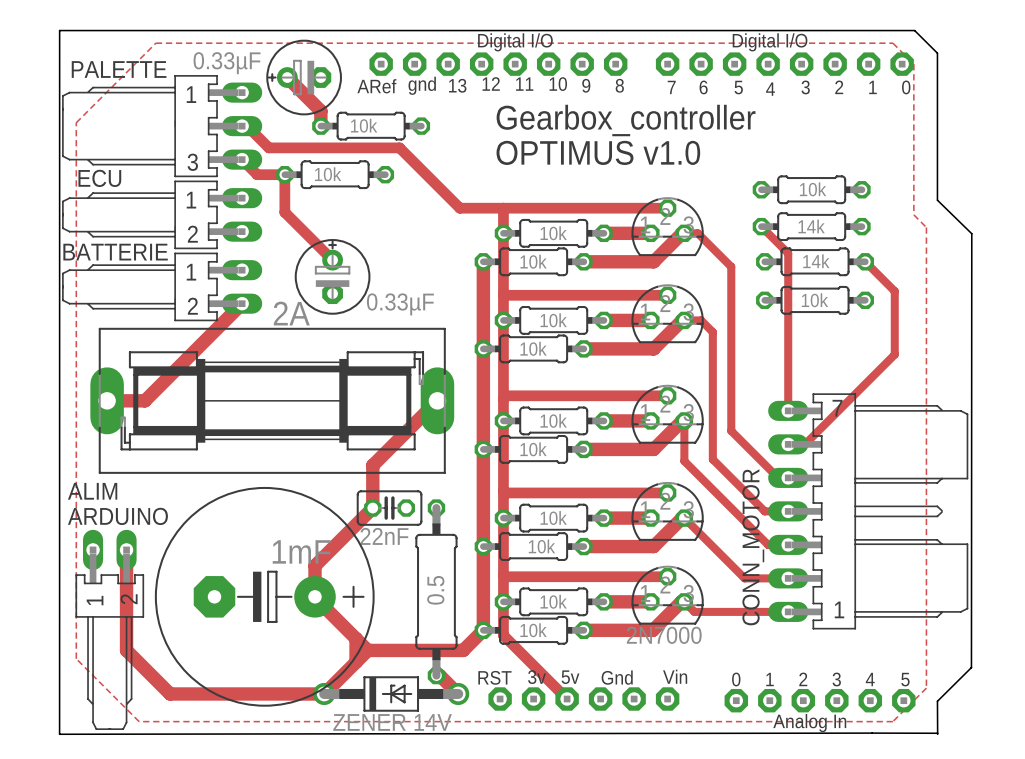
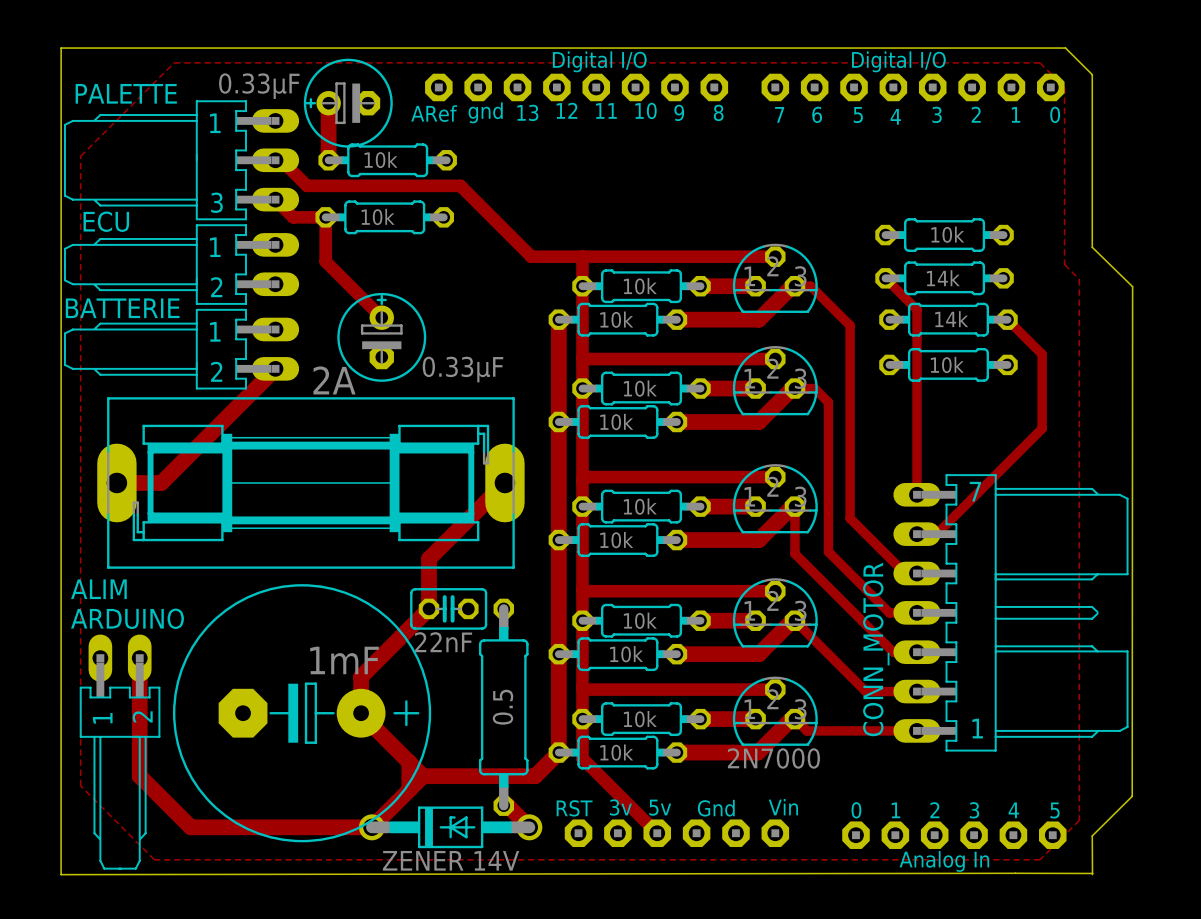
track: (287, 77) (320, 111) (320, 126) -> (328, 103) (328, 160)
text: Gearbox_controller (626, 120) -> none
part position: (371, 126) -> (387, 160)
text: OPTIMUS v1.0 (598, 152) -> none

